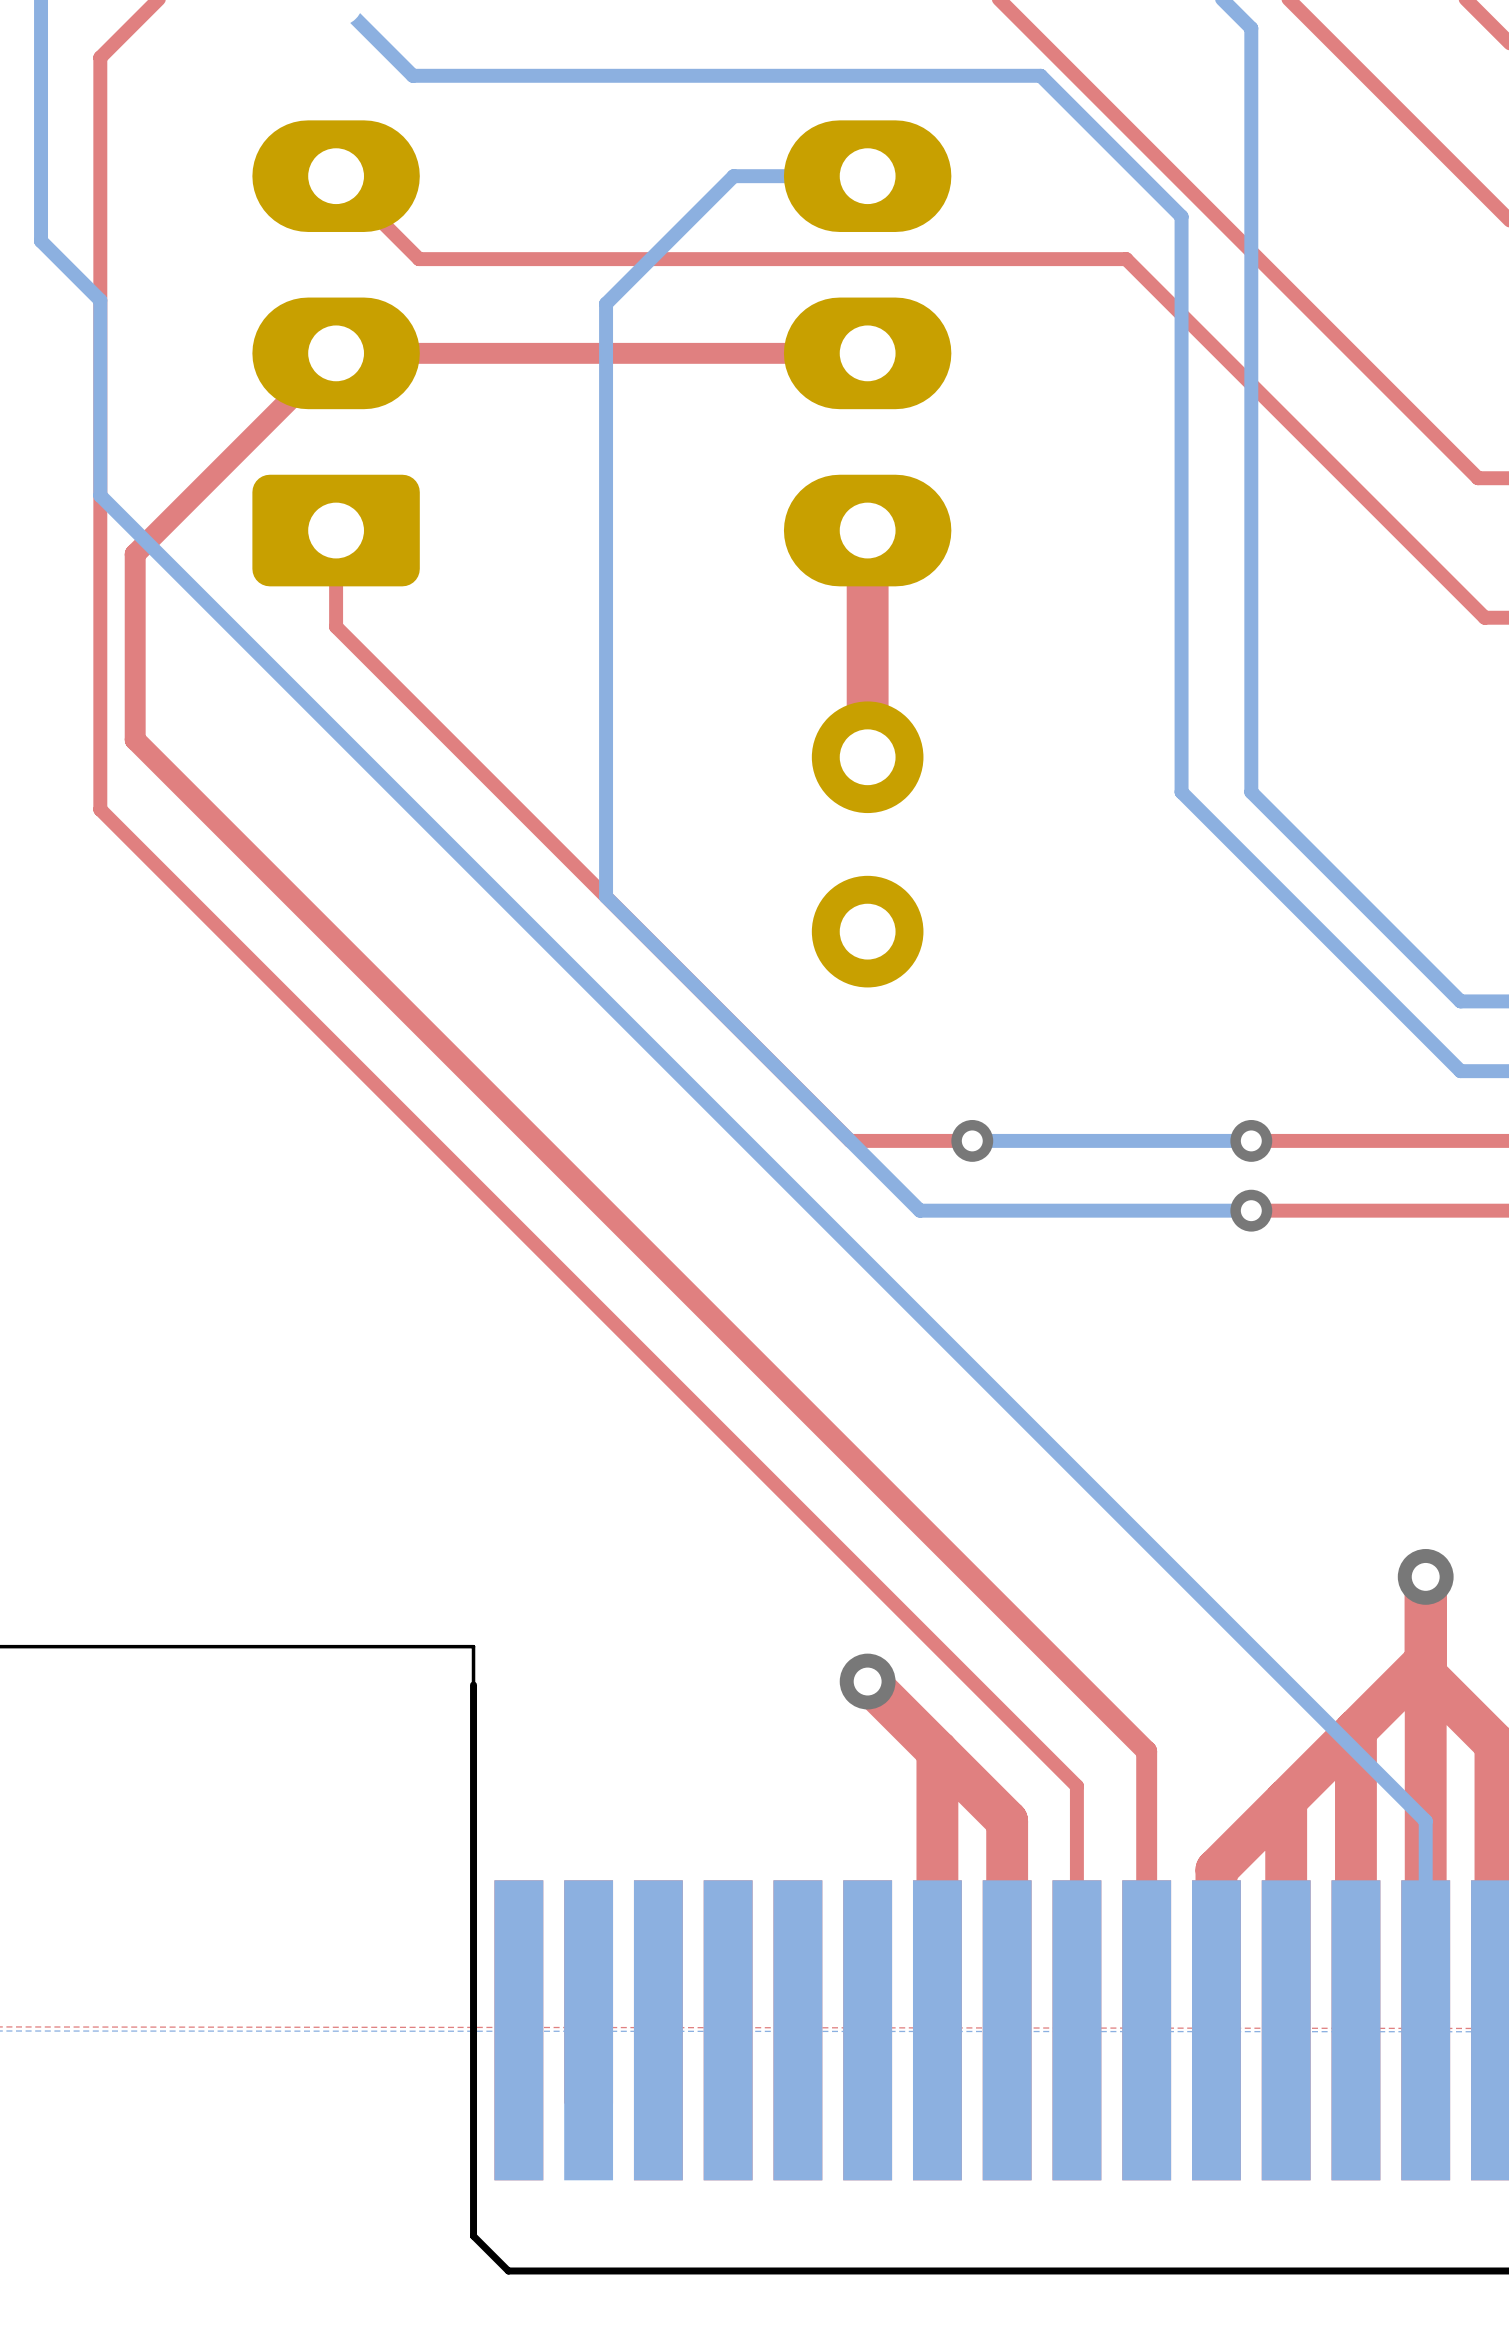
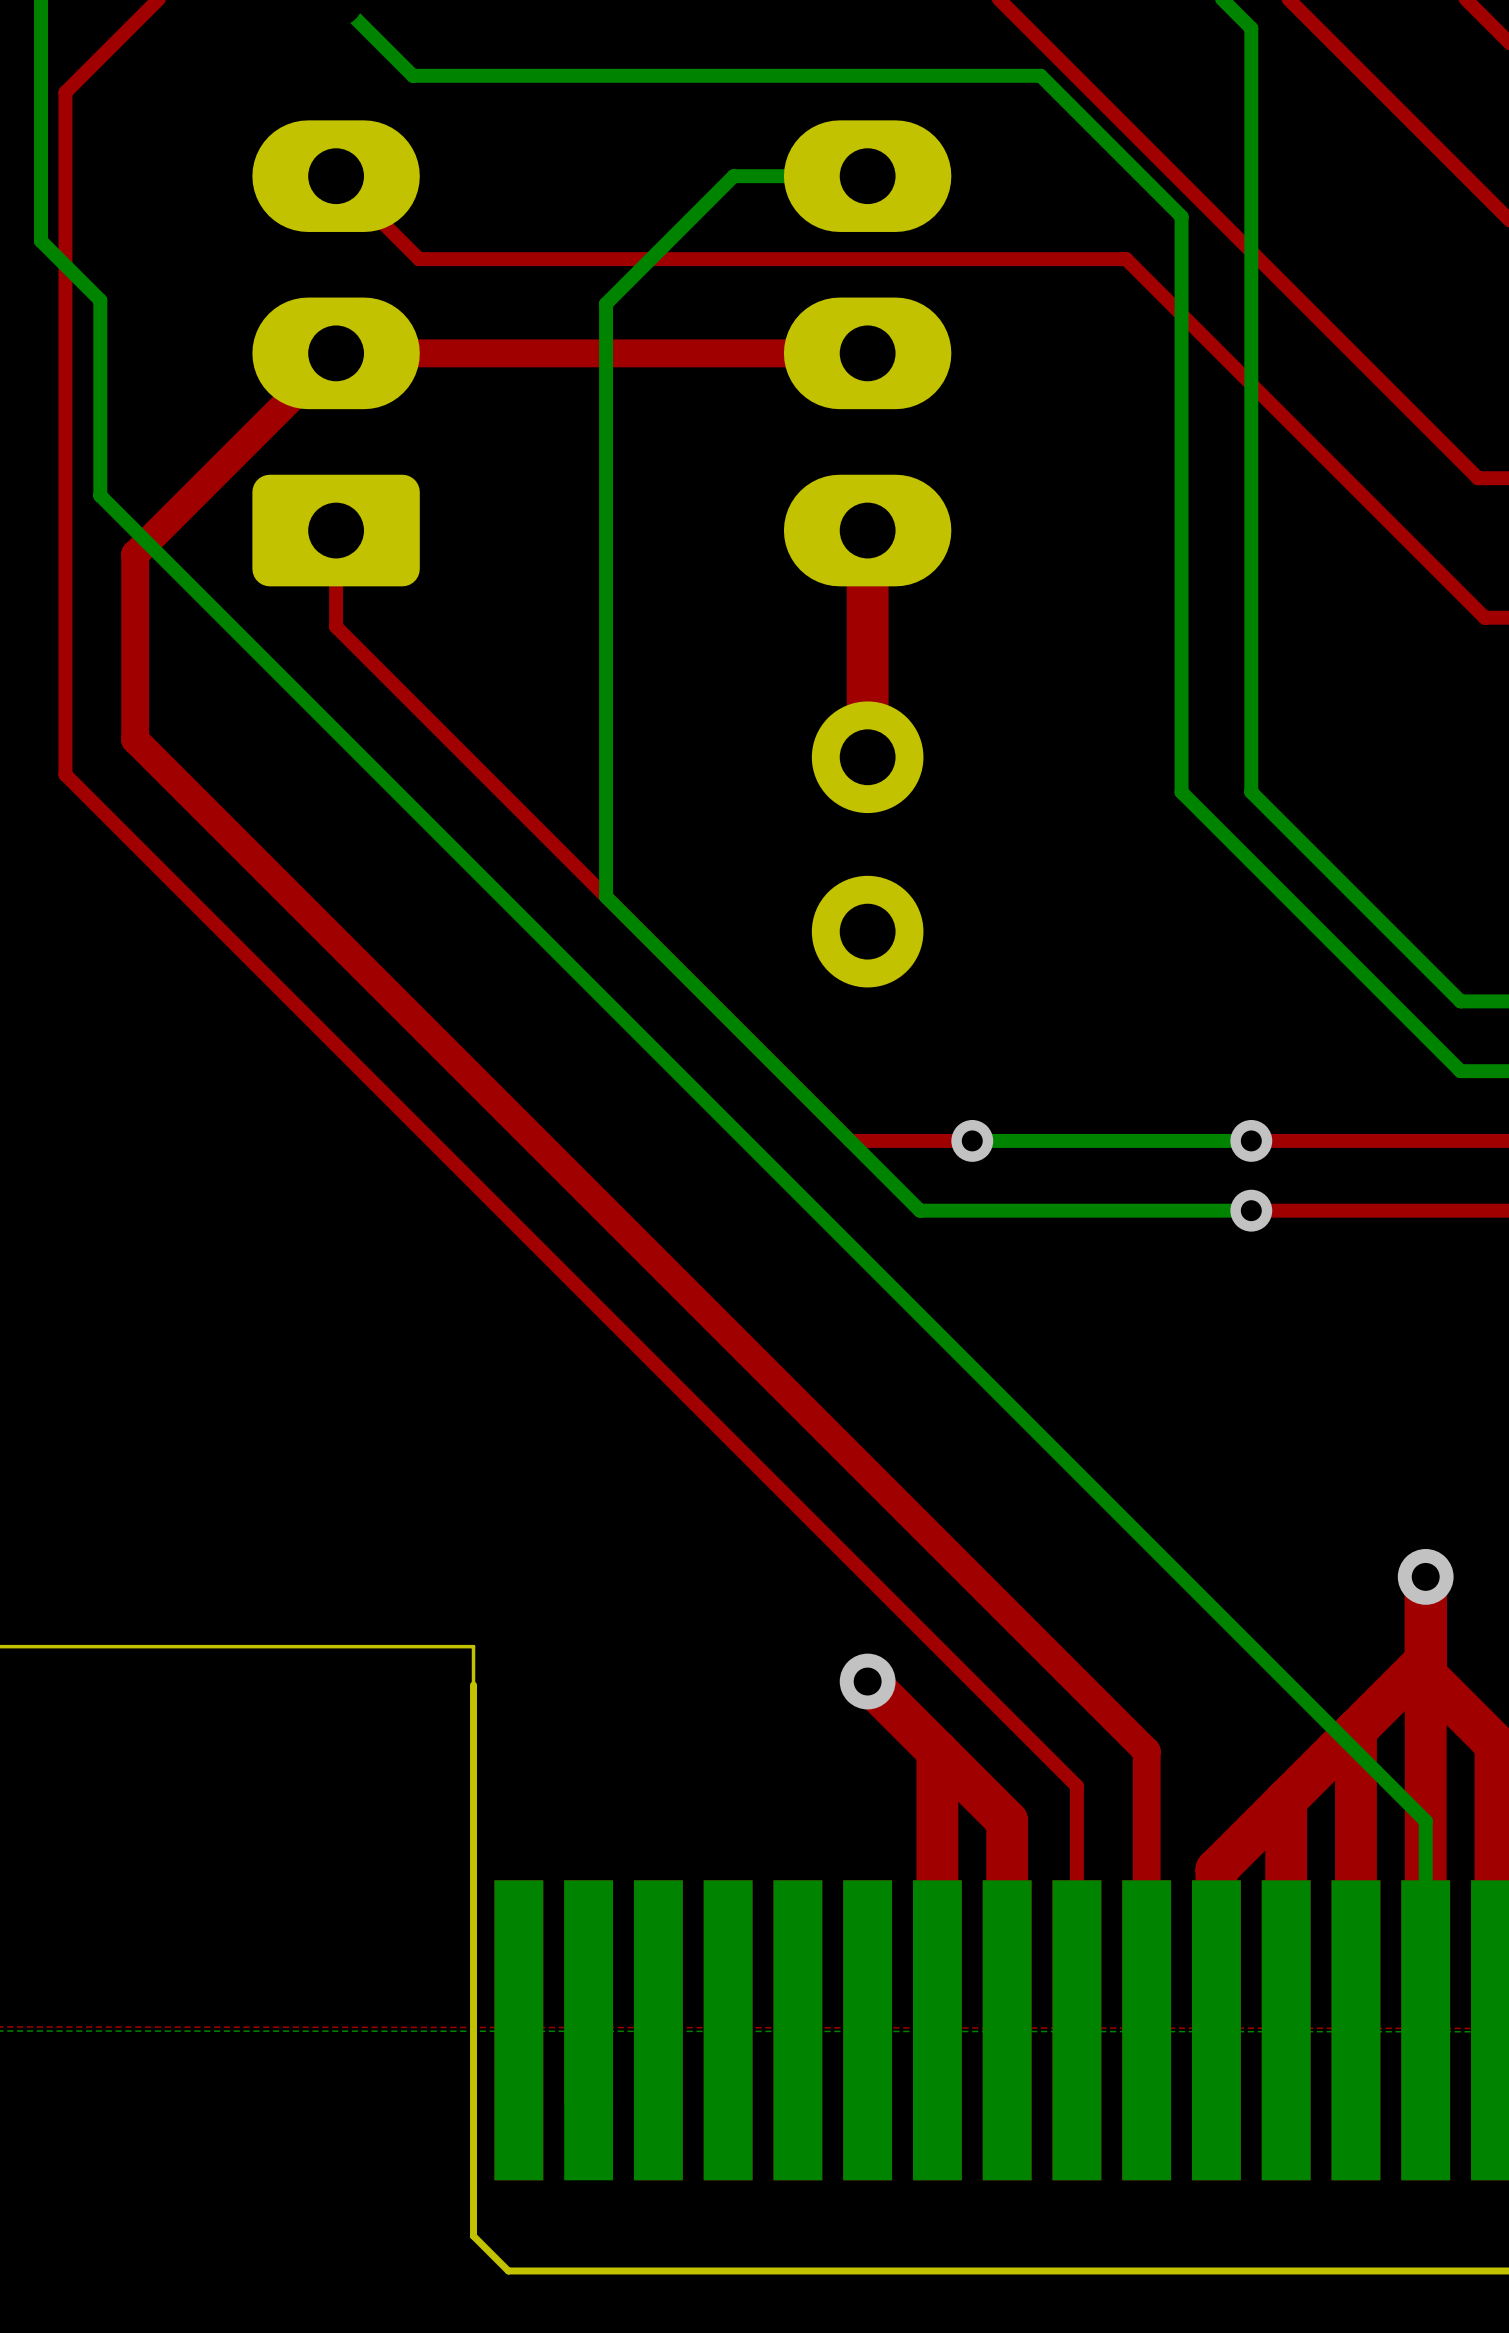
top track: (100, 57) (100, 809) -> (100, 57) (65, 92) (65, 774) (100, 809)
top track width: thin (867, 353) (336, 353) (135, 554) (135, 739) (1146, 1751) (1146, 2030) -> thick (867, 353) (336, 353) (135, 554) (135, 739) (1146, 1751) (1146, 2030)

